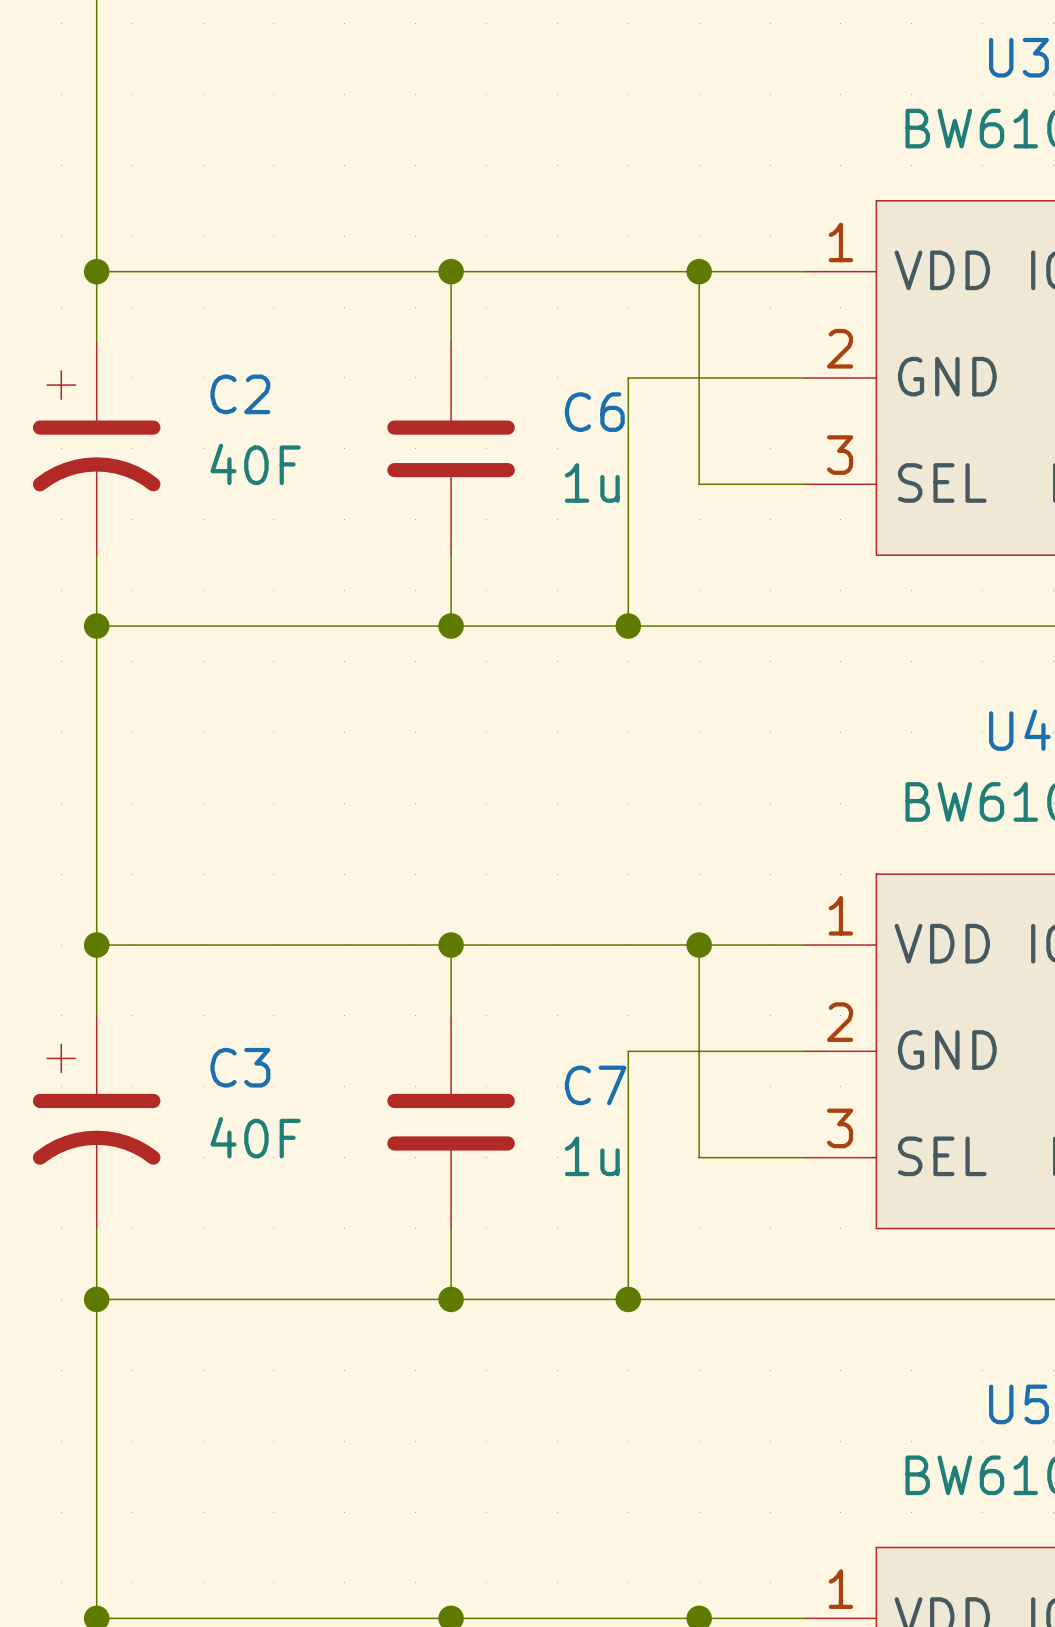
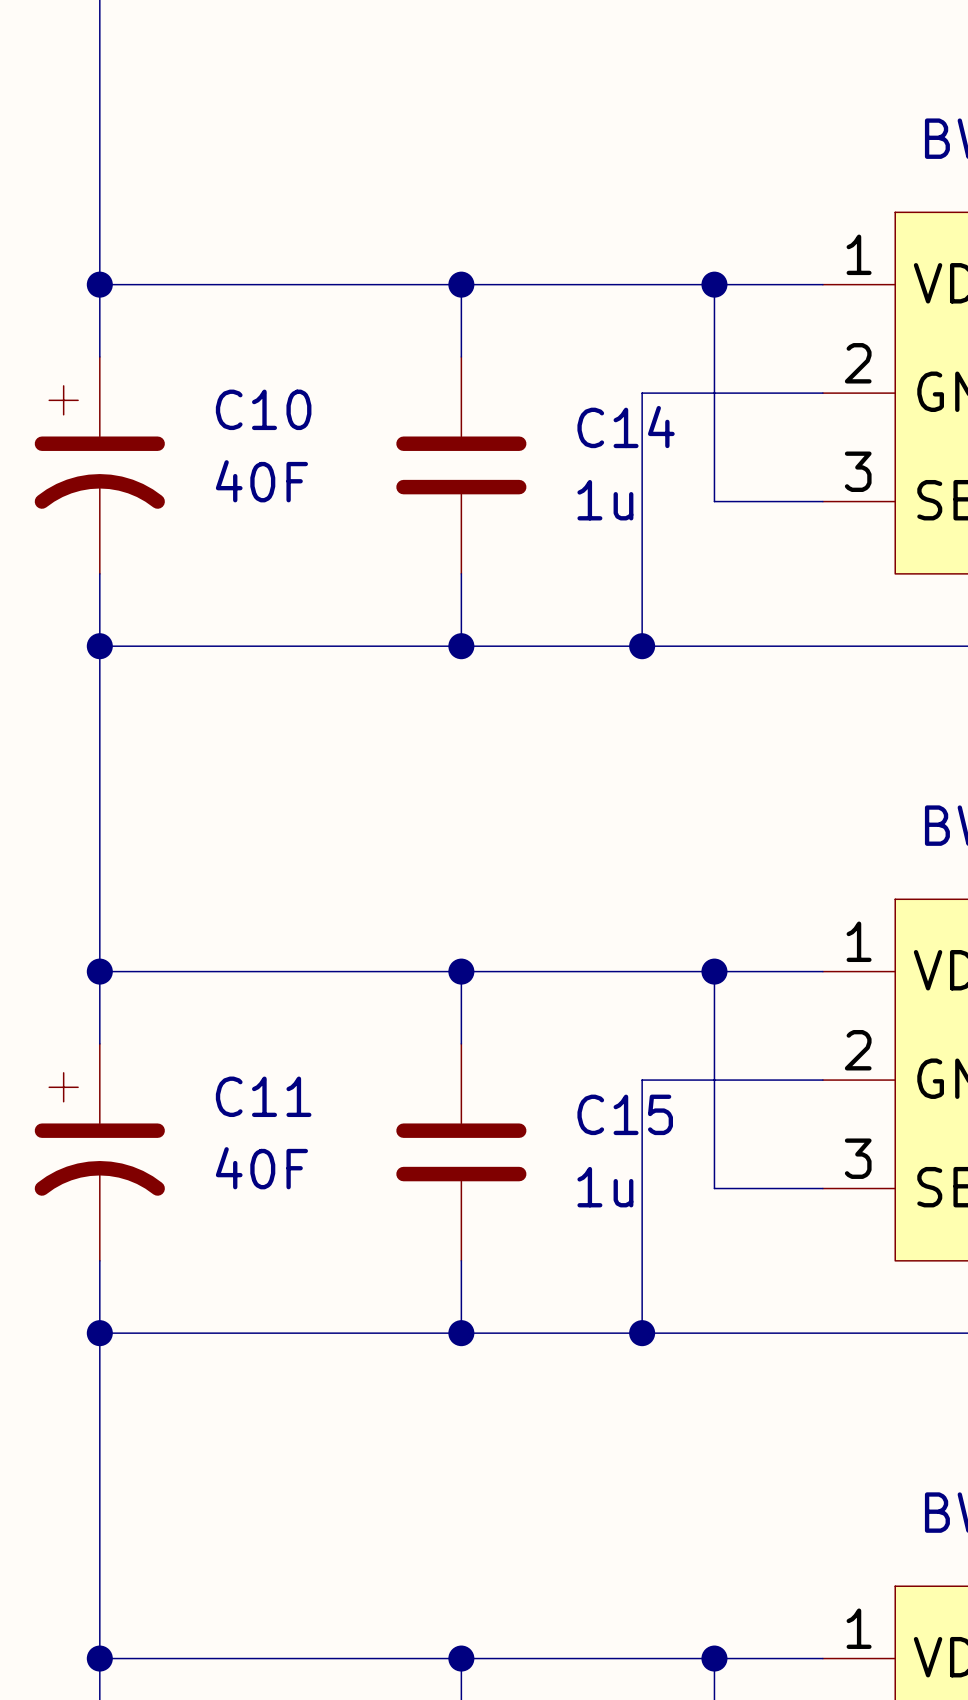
C2 name: C2 (240, 394) -> C10 (263, 409)
C6 name: C6 (594, 412) -> C14 (626, 427)
C3 name: C3 (240, 1067) -> C11 (263, 1096)
C7 name: C7 (595, 1085) -> C15 (625, 1114)

